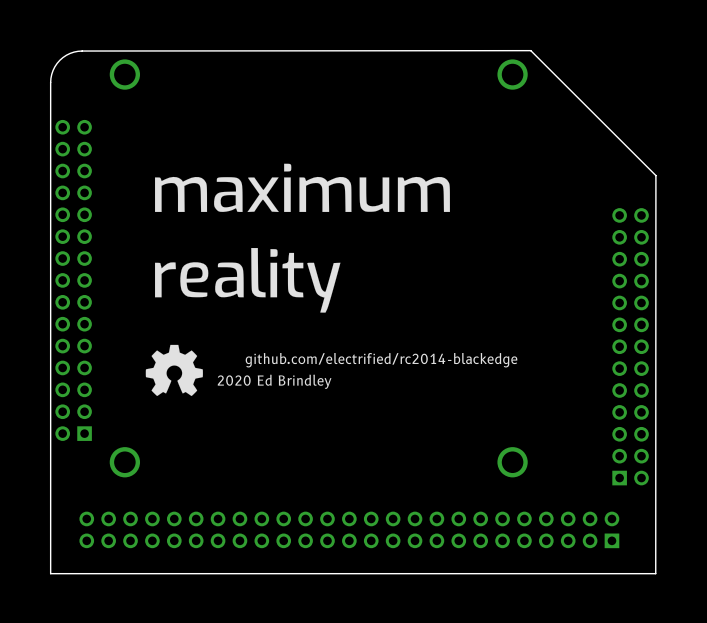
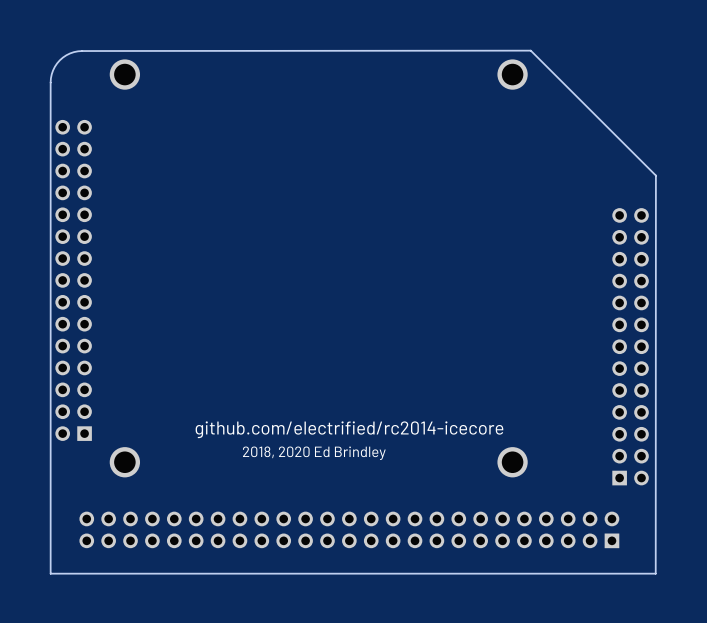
drawing: [154, 163, 450, 313] -> none
drawing: [145, 344, 203, 397] -> none
text: github.com/electrified/rc2014-blackedge (381, 360) -> none
text: 2020 Ed Brindley (274, 381) -> none
text: none -> github.com/electrified/rc2014-icecore (349, 429)
text: none -> 2018, 2020 Ed Brindley (314, 453)

